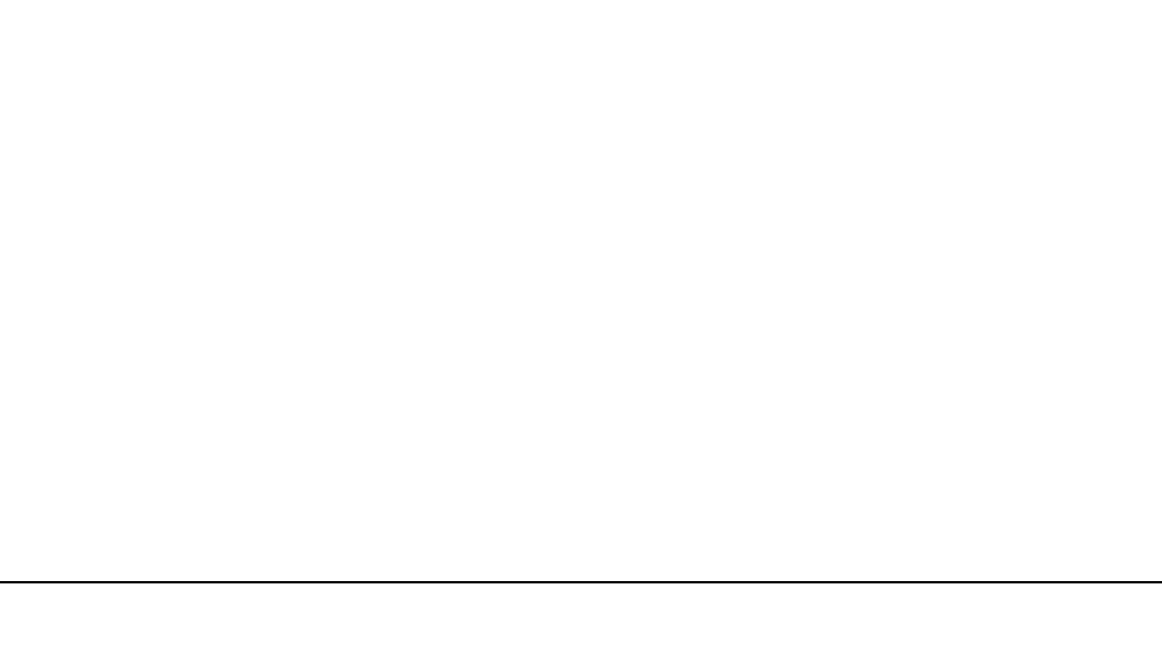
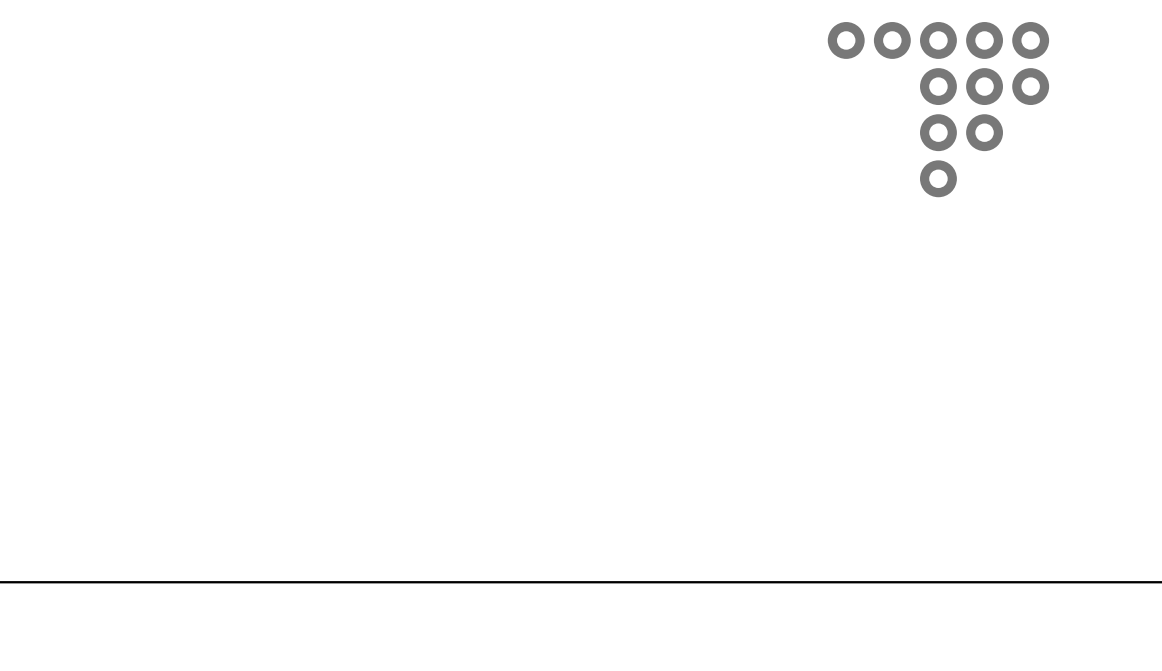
via: none -> (846, 40)
via: none -> (892, 40)
via: none -> (938, 40)
via: none -> (984, 40)
via: none -> (1030, 40)
via: none -> (938, 86)
via: none -> (984, 86)
via: none -> (1030, 86)
via: none -> (938, 132)
via: none -> (984, 132)
via: none -> (938, 178)

